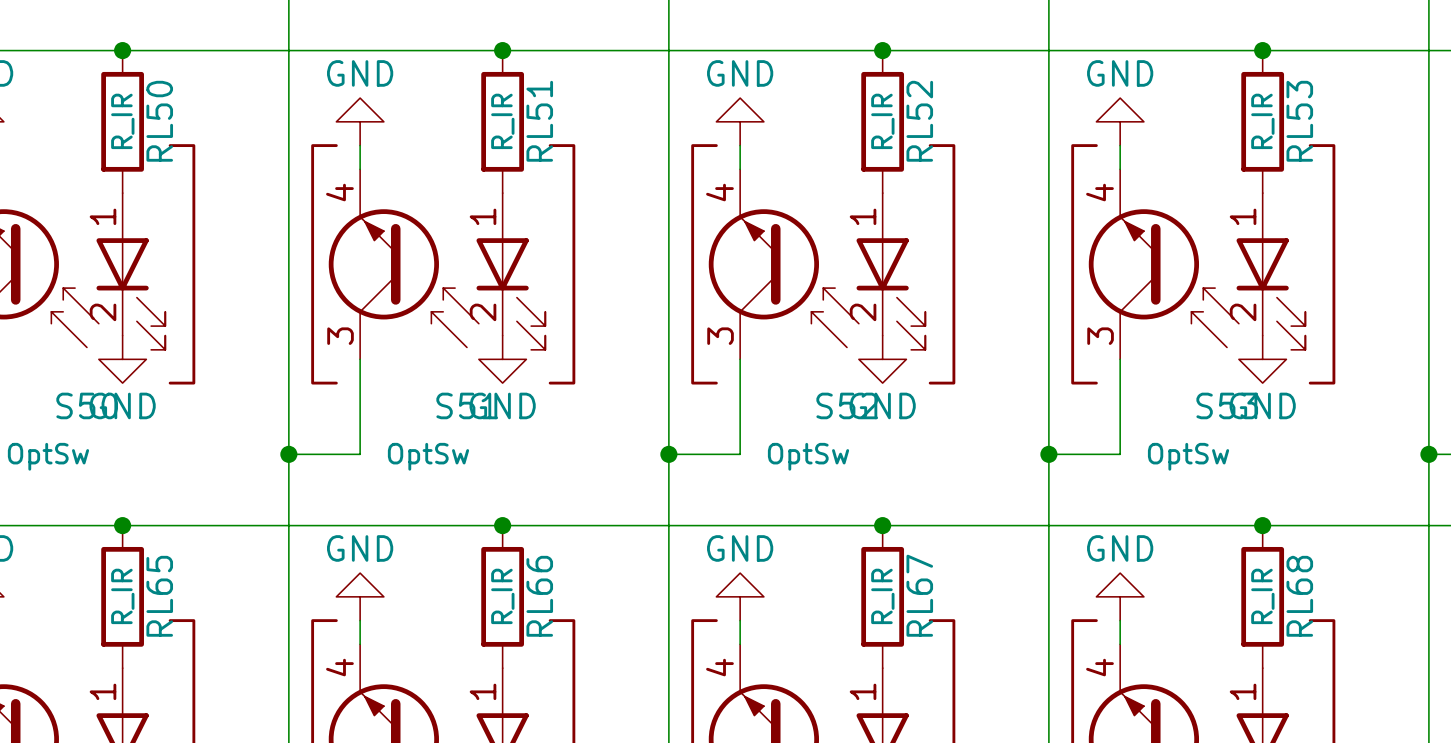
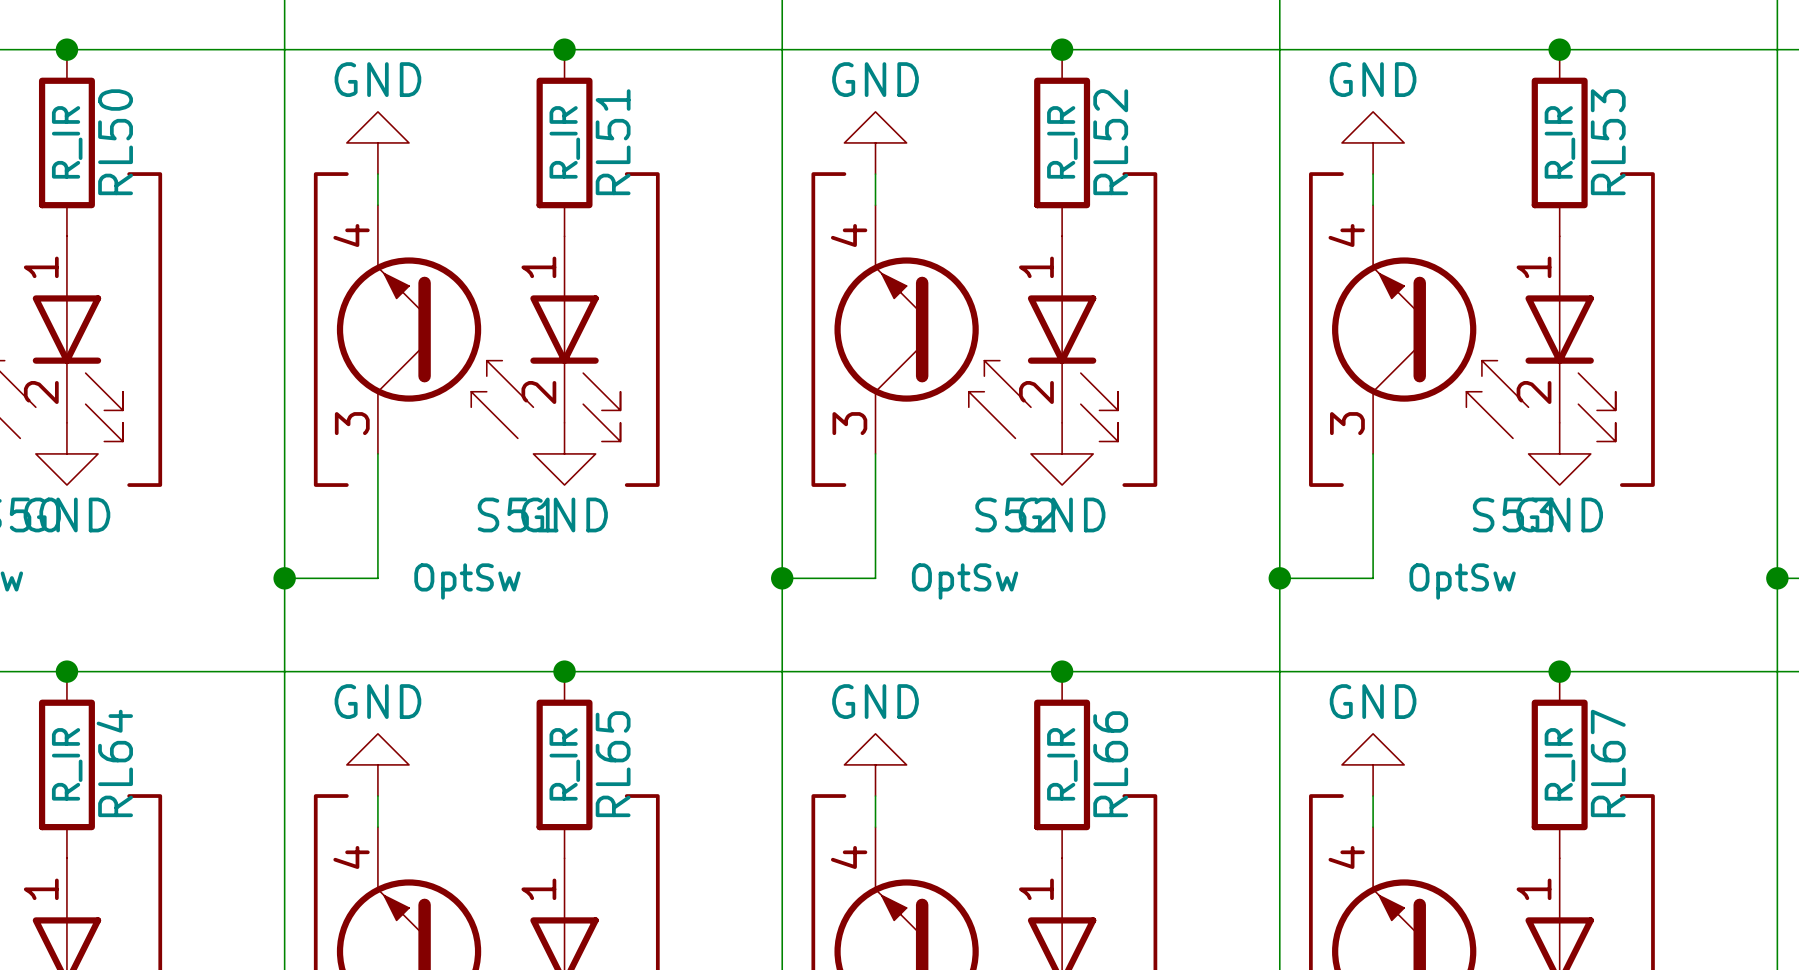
RL67 name: RL67 (919, 595) -> RL66 (1110, 764)
RL65 name: RL65 (159, 596) -> RL64 (114, 763)
RL66 name: RL66 (539, 596) -> RL65 (613, 764)
RL68 name: RL68 (1299, 596) -> RL67 (1608, 763)

